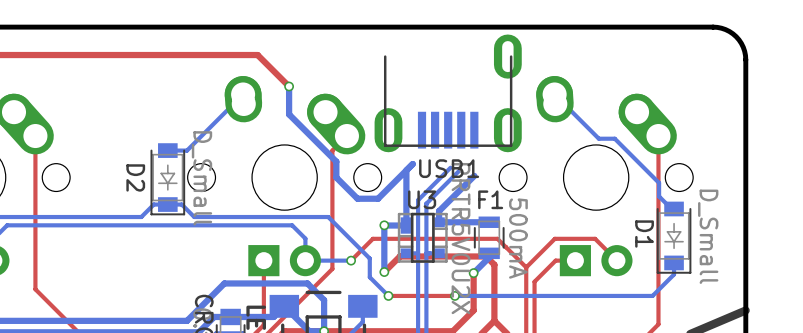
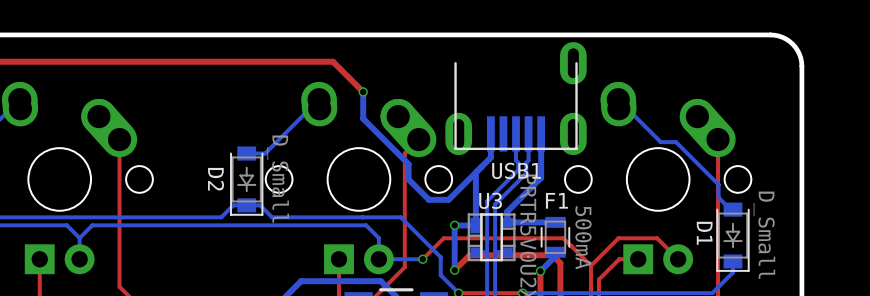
bottom track: none -> (490, 133) (490, 157) (481, 166)
bottom track: none -> (516, 133) (516, 160) (518, 162) (518, 170)
bottom track: none -> (528, 133) (528, 160) (526, 162) (526, 173)
bottom track: none -> (541, 133) (541, 177)

